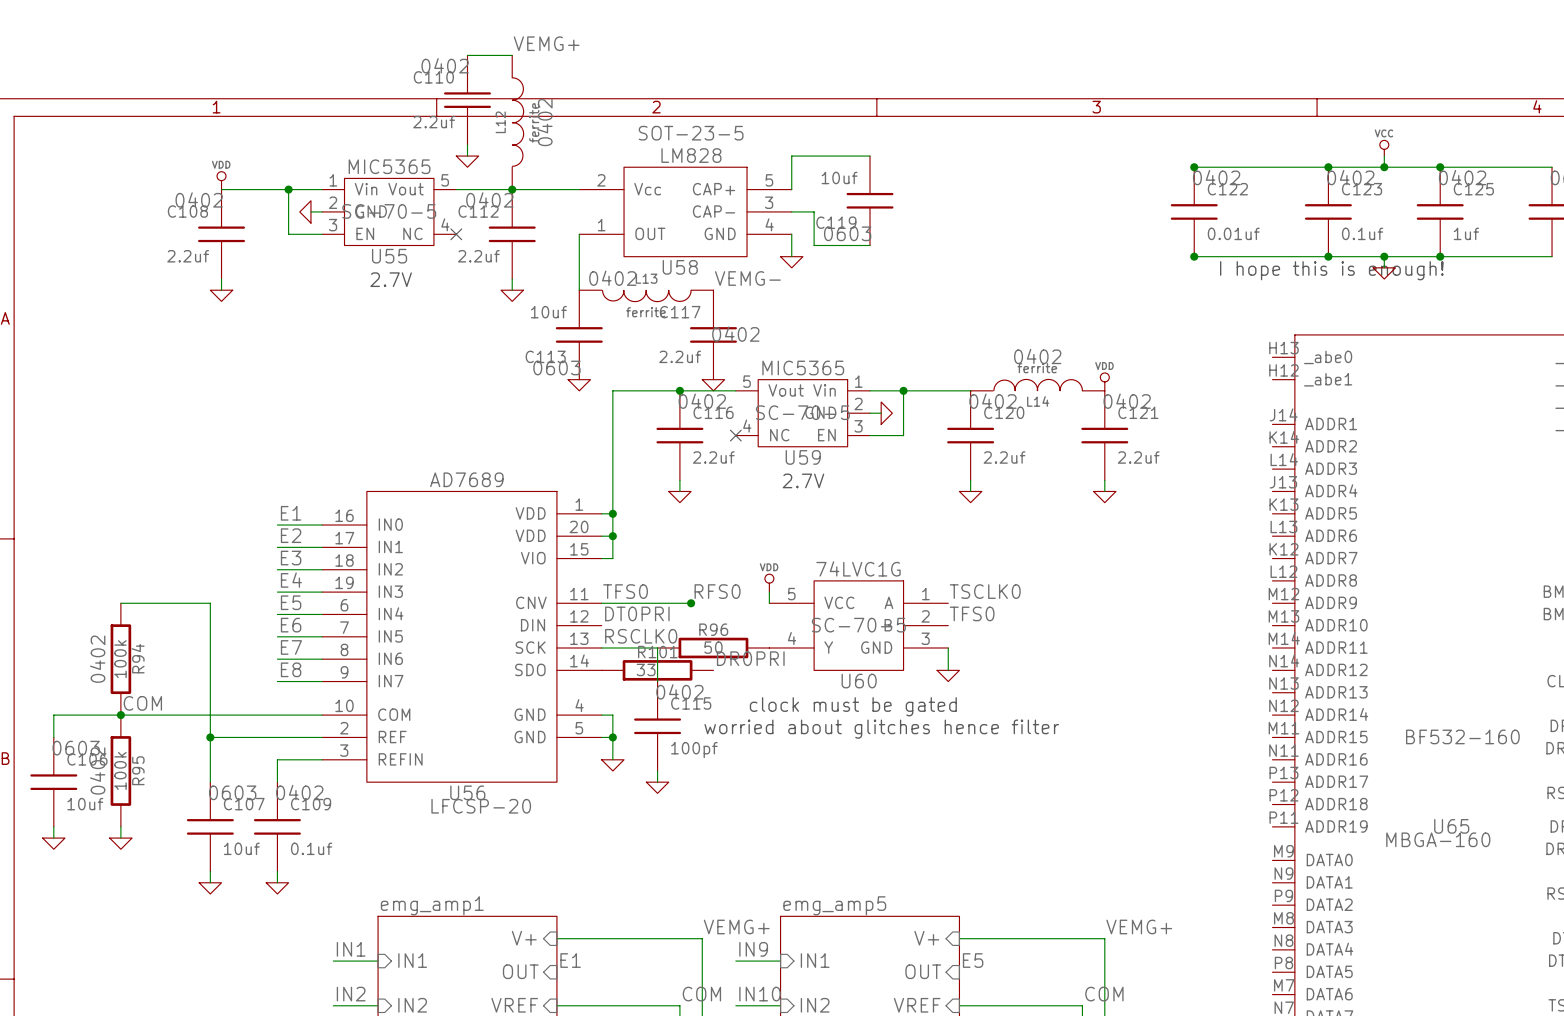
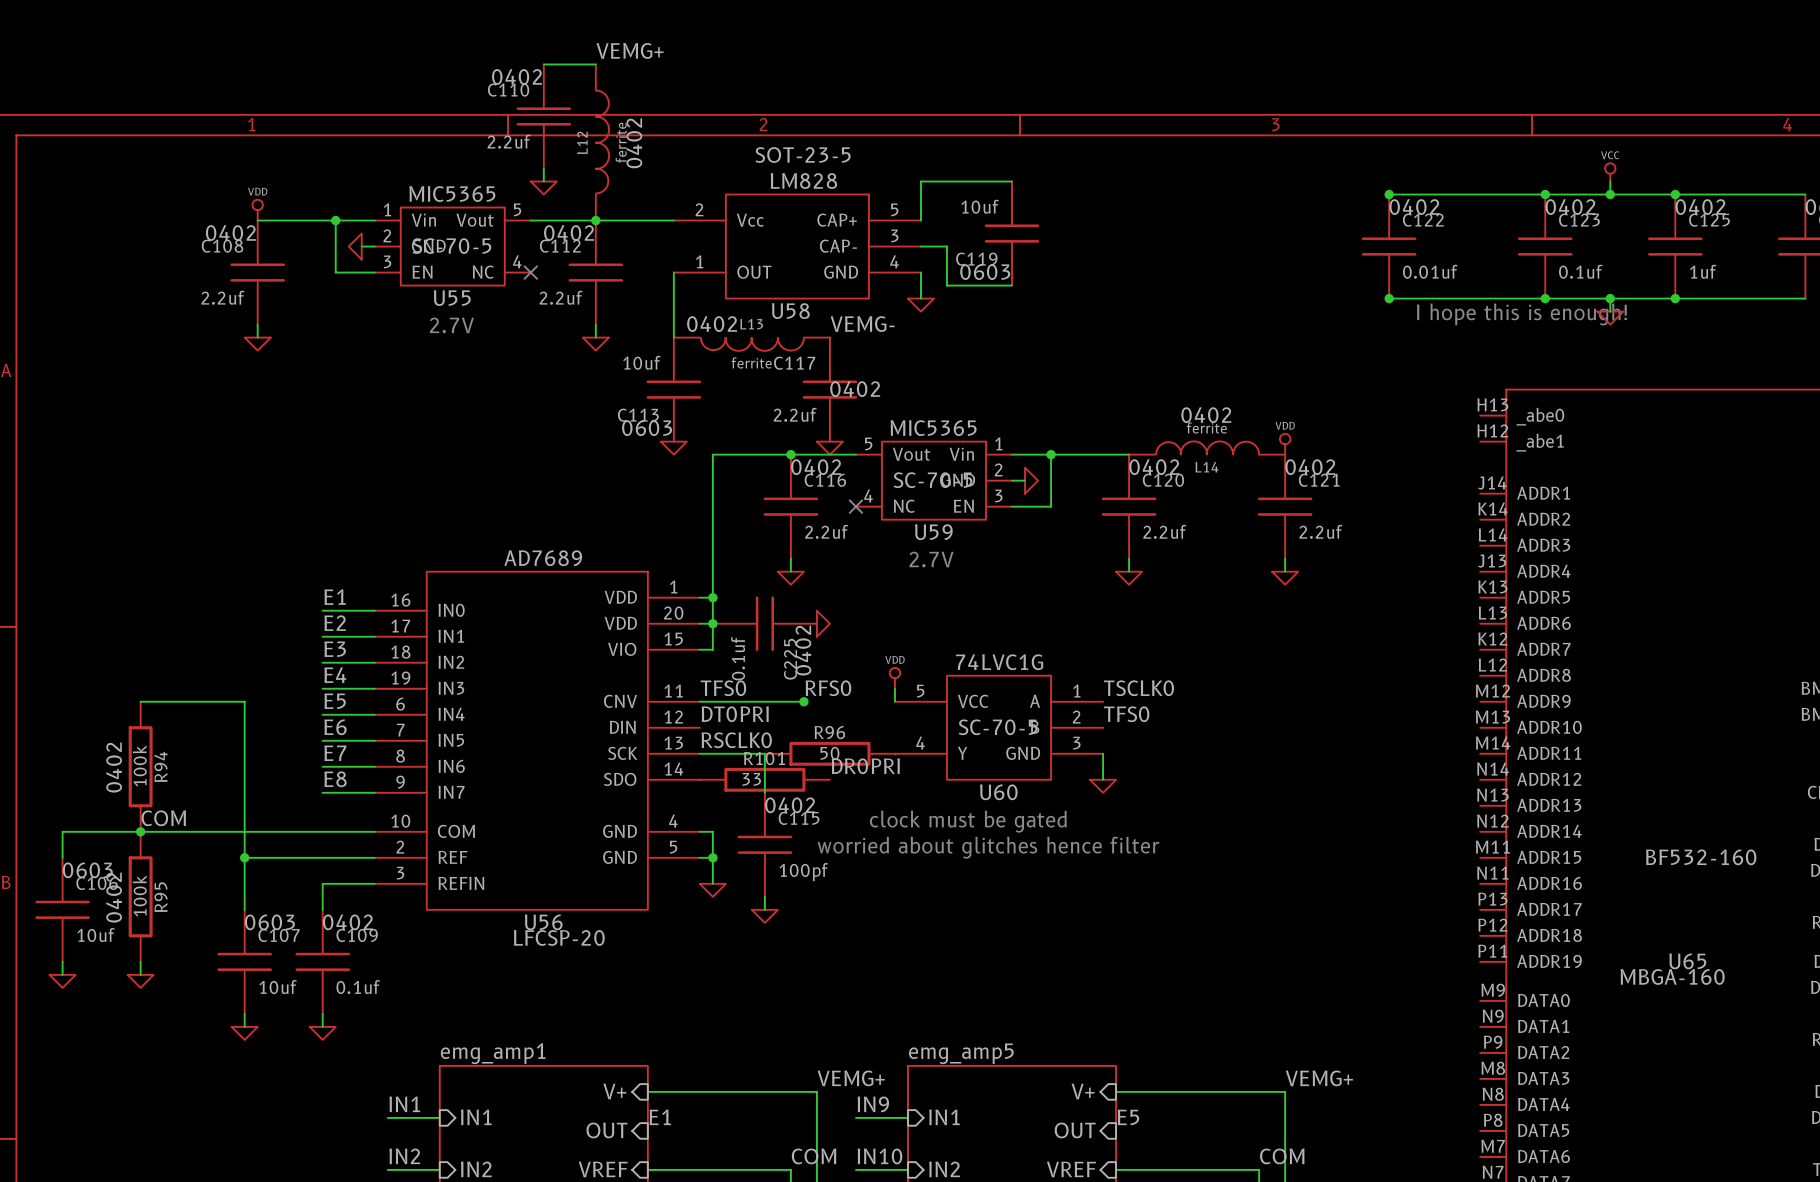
C225: none -> 0.1uf (764, 623)
power symbol: none -> (823, 623)

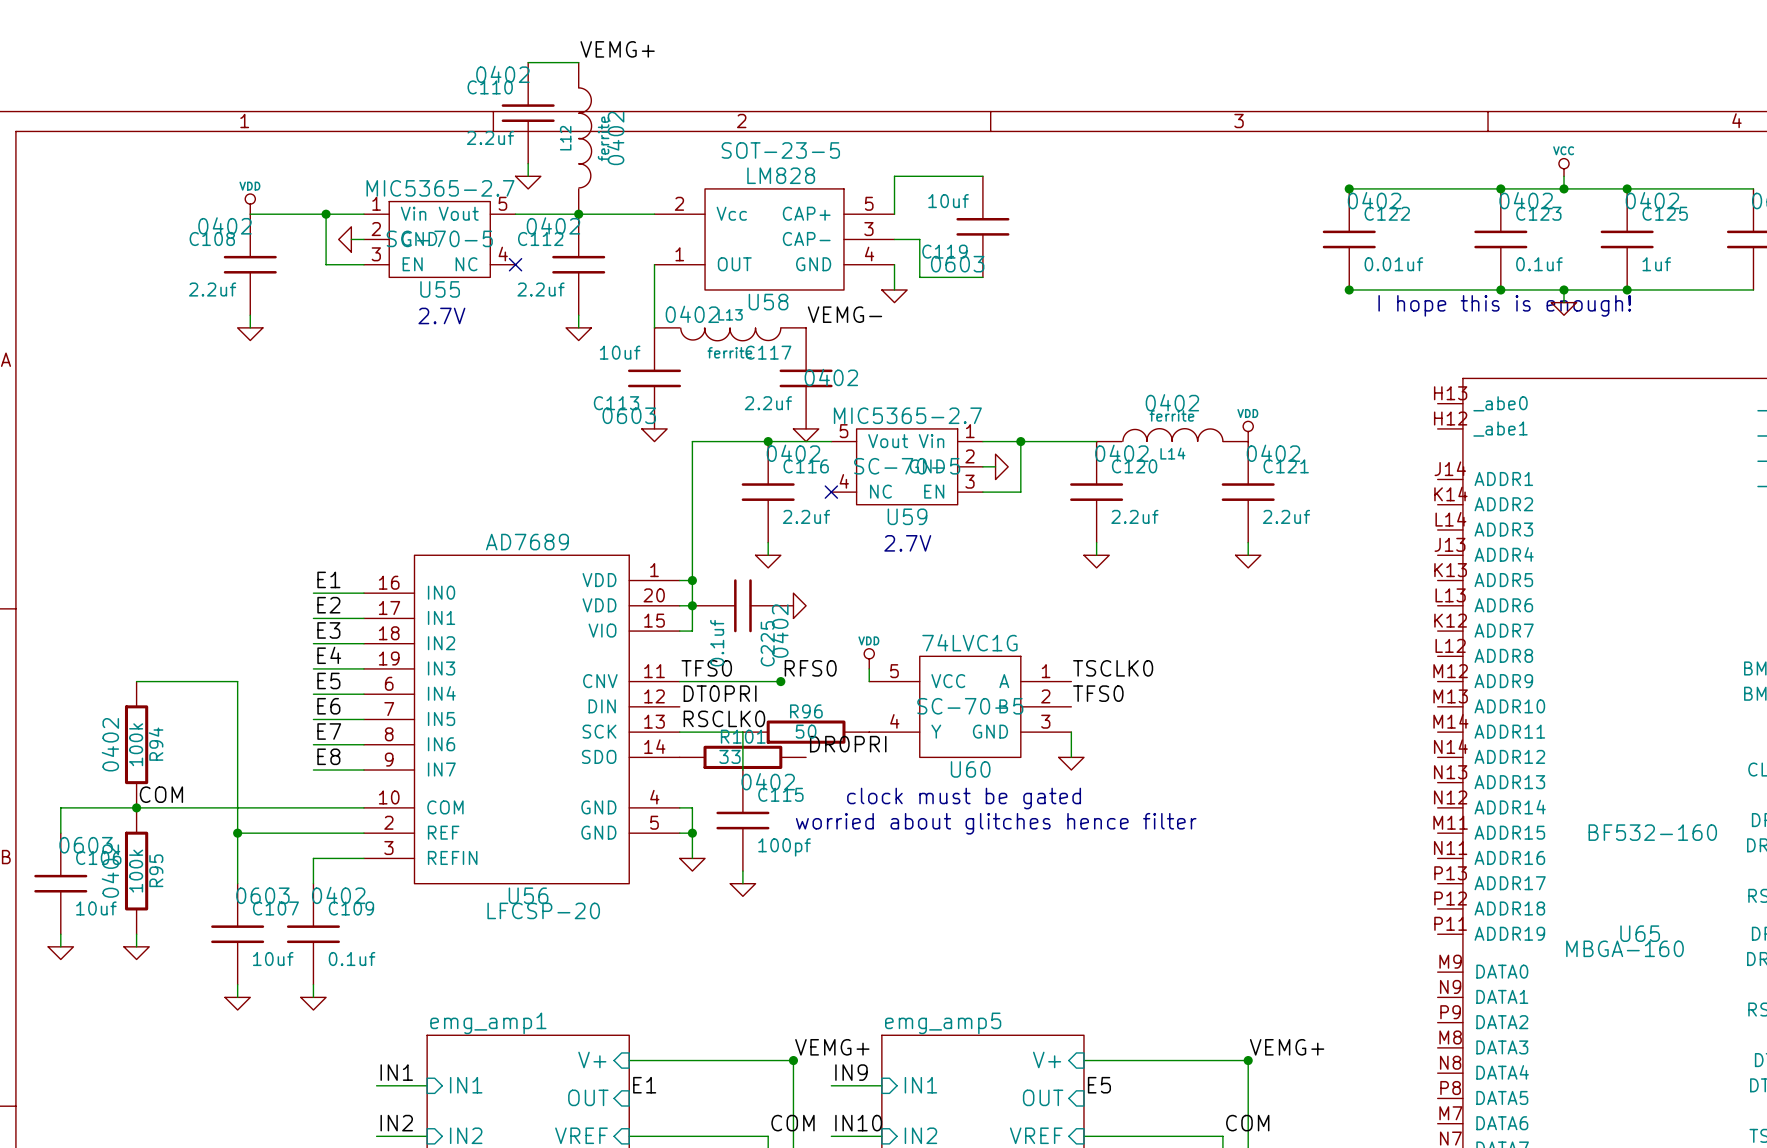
U55 value: MIC5365 (452, 194) -> MIC5365-2.7 (440, 188)
U59 value: MIC5365 (933, 428) -> MIC5365-2.7 (907, 415)
junction: none -> (793, 1060)
junction: none -> (1248, 1060)

